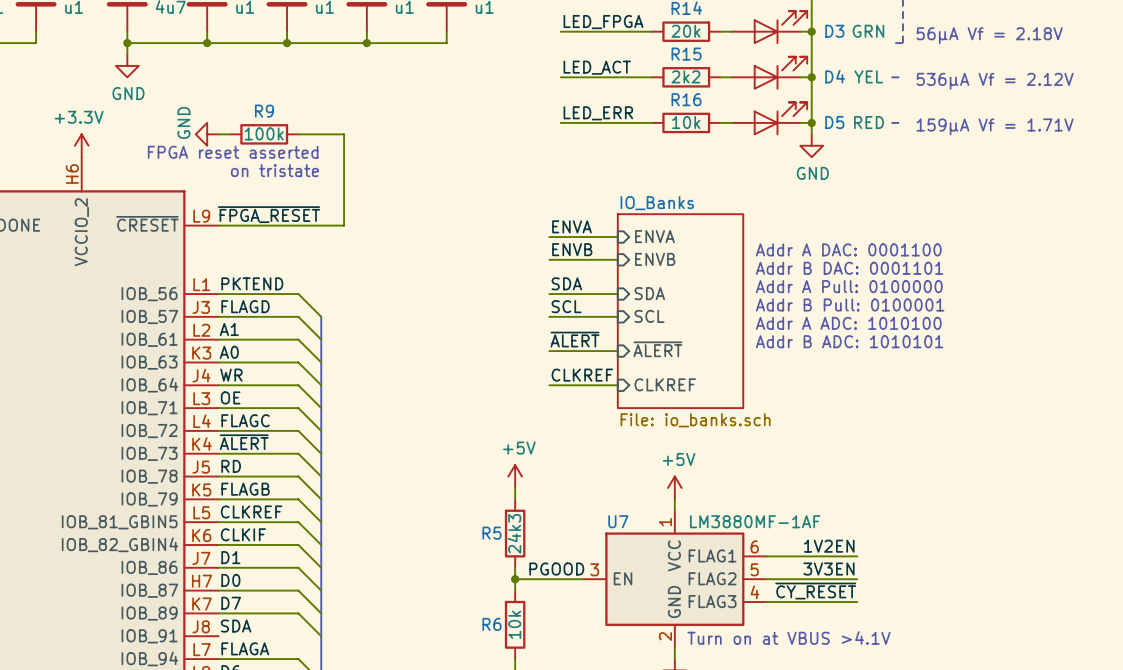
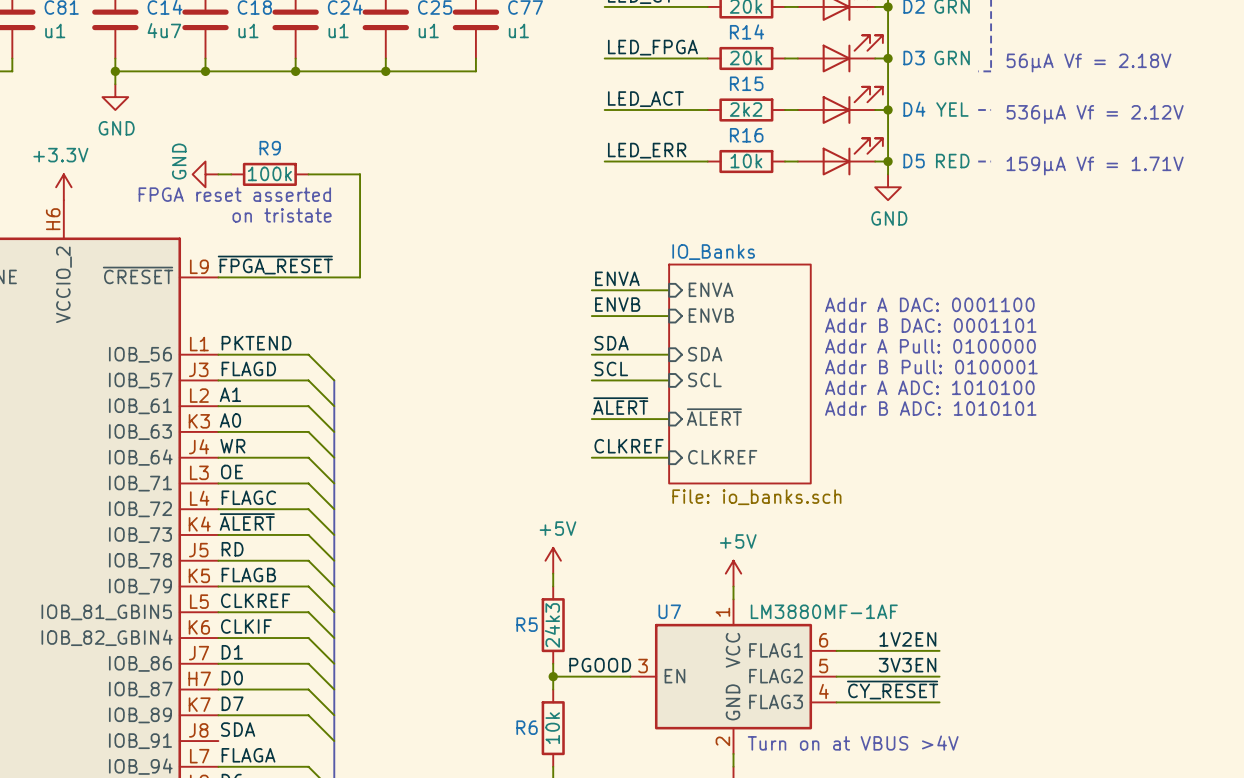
text: Turn on at VBUS >4.1V (788, 638) -> Turn on at VBUS >4V (853, 743)

